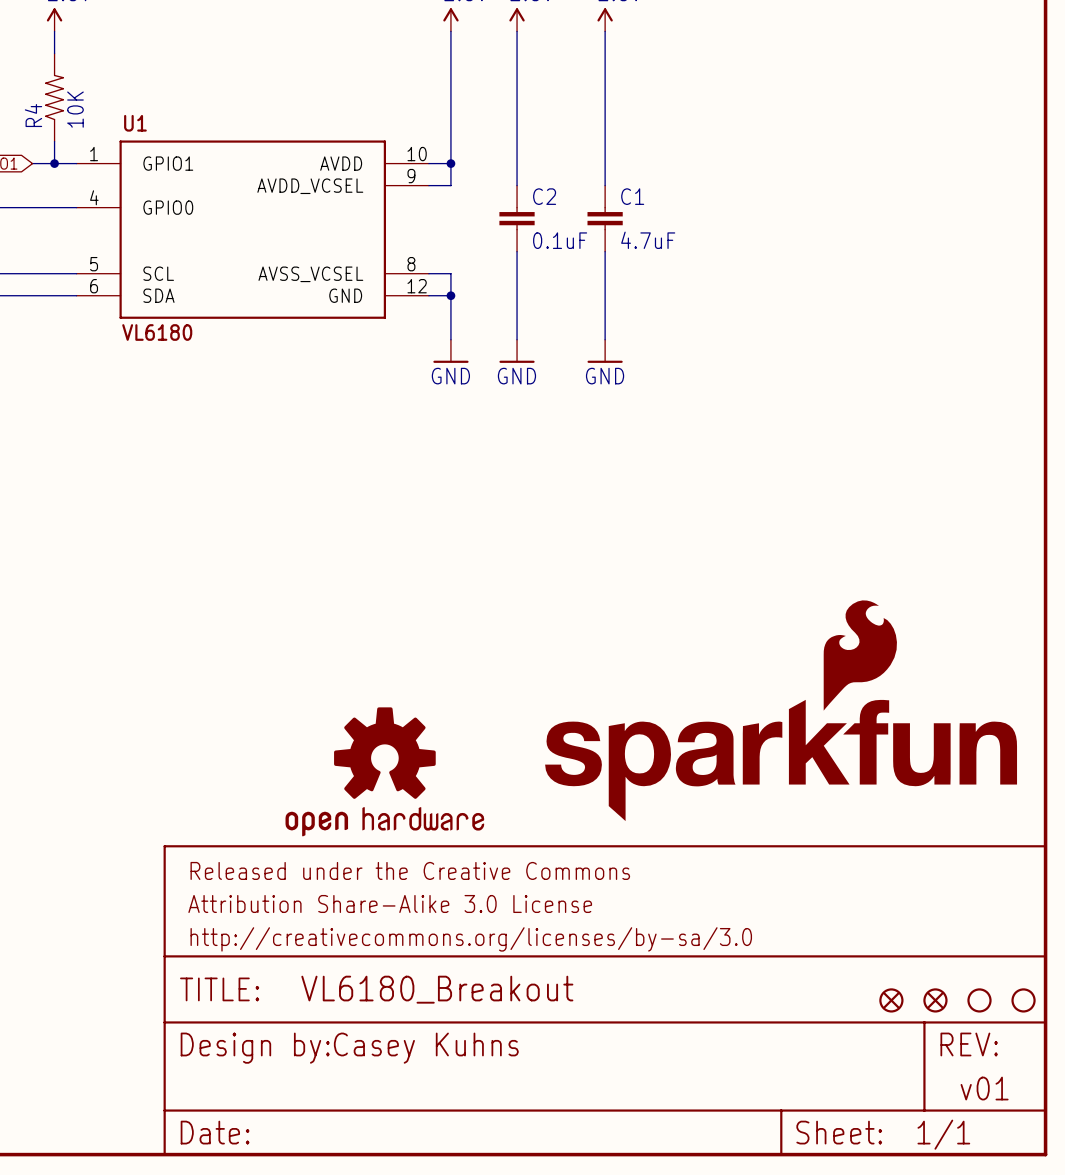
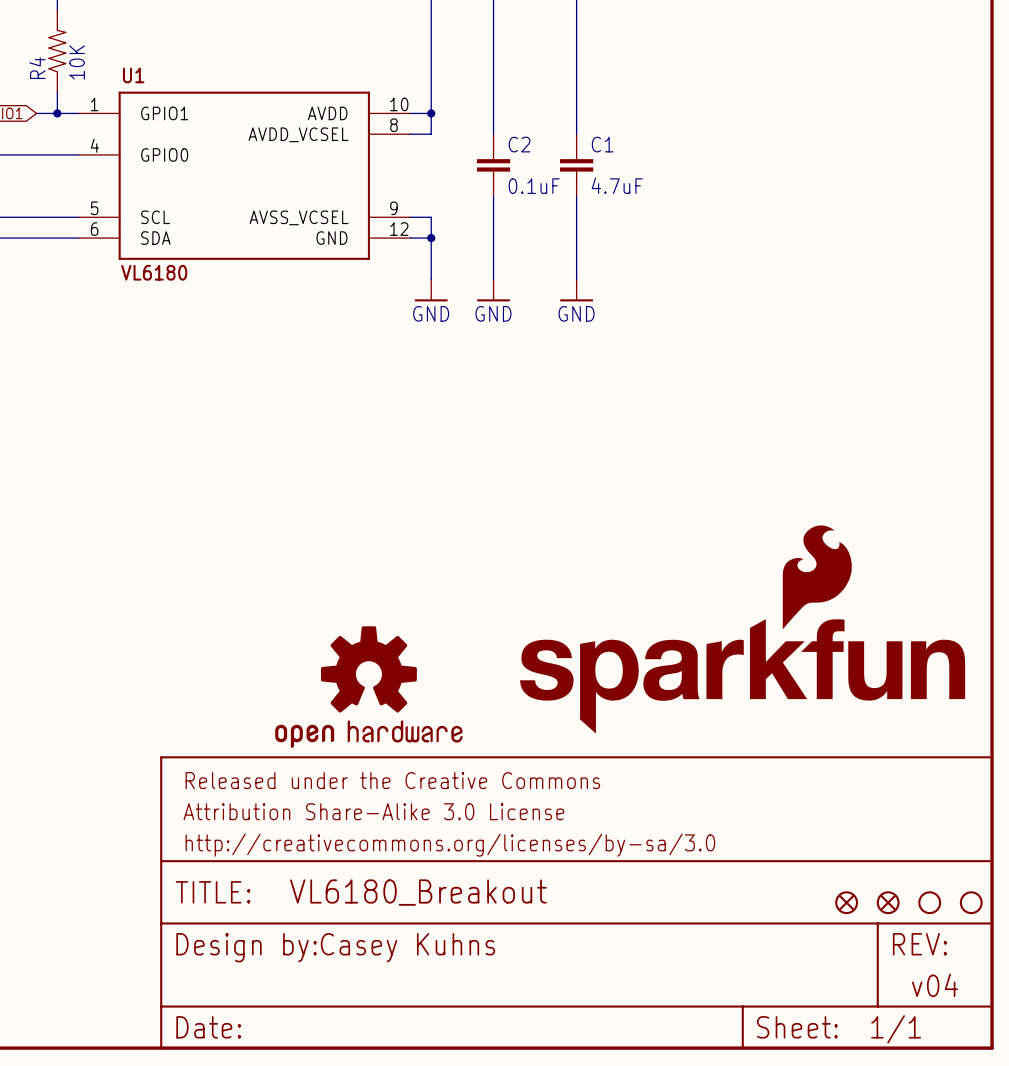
U1 pin number: 9 (411, 176) -> 8 (393, 125)
U1 pin number: 8 (411, 264) -> 9 (393, 208)
text: v01 (984, 1088) -> v04 (934, 985)

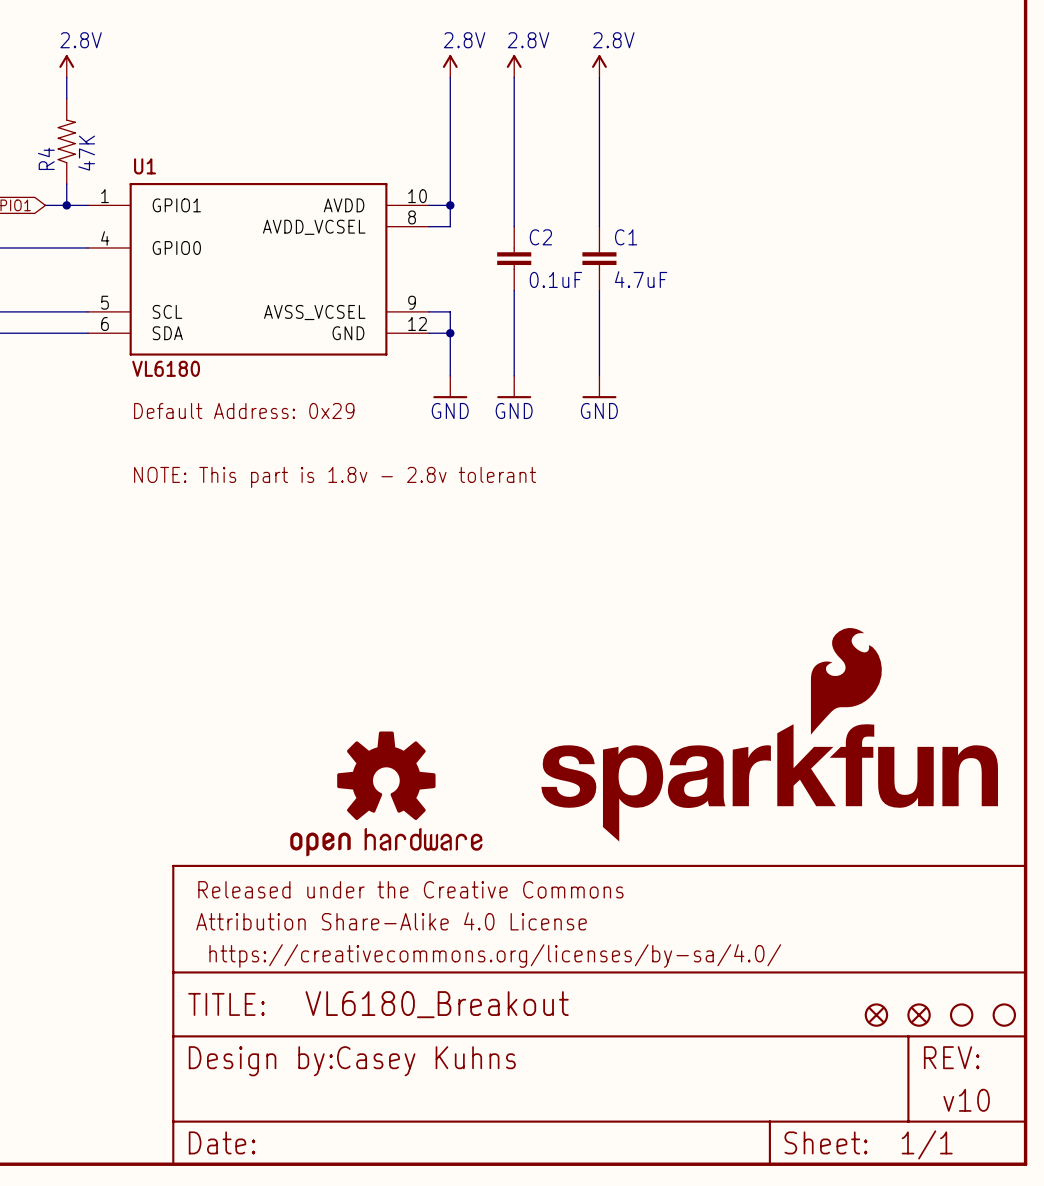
R4 value: 10K (77, 62) -> 47K (86, 153)
text: none -> Default Address: 0x29 (244, 410)
text: none -> NOTE: This part is 1.8v - 2.8v tolerant (335, 477)
part text: Attribution Share-Alike 3.0 License (373, 811) -> Attribution Share-Alike 4.0 License (391, 921)
part text: http://creativecommons.org/licenses/by-sa/3.0 (450, 845) -> https://creativecommons.org/licenses/by-sa/4.0/ (495, 956)
text: v04 (934, 985) -> v10 (966, 1100)

